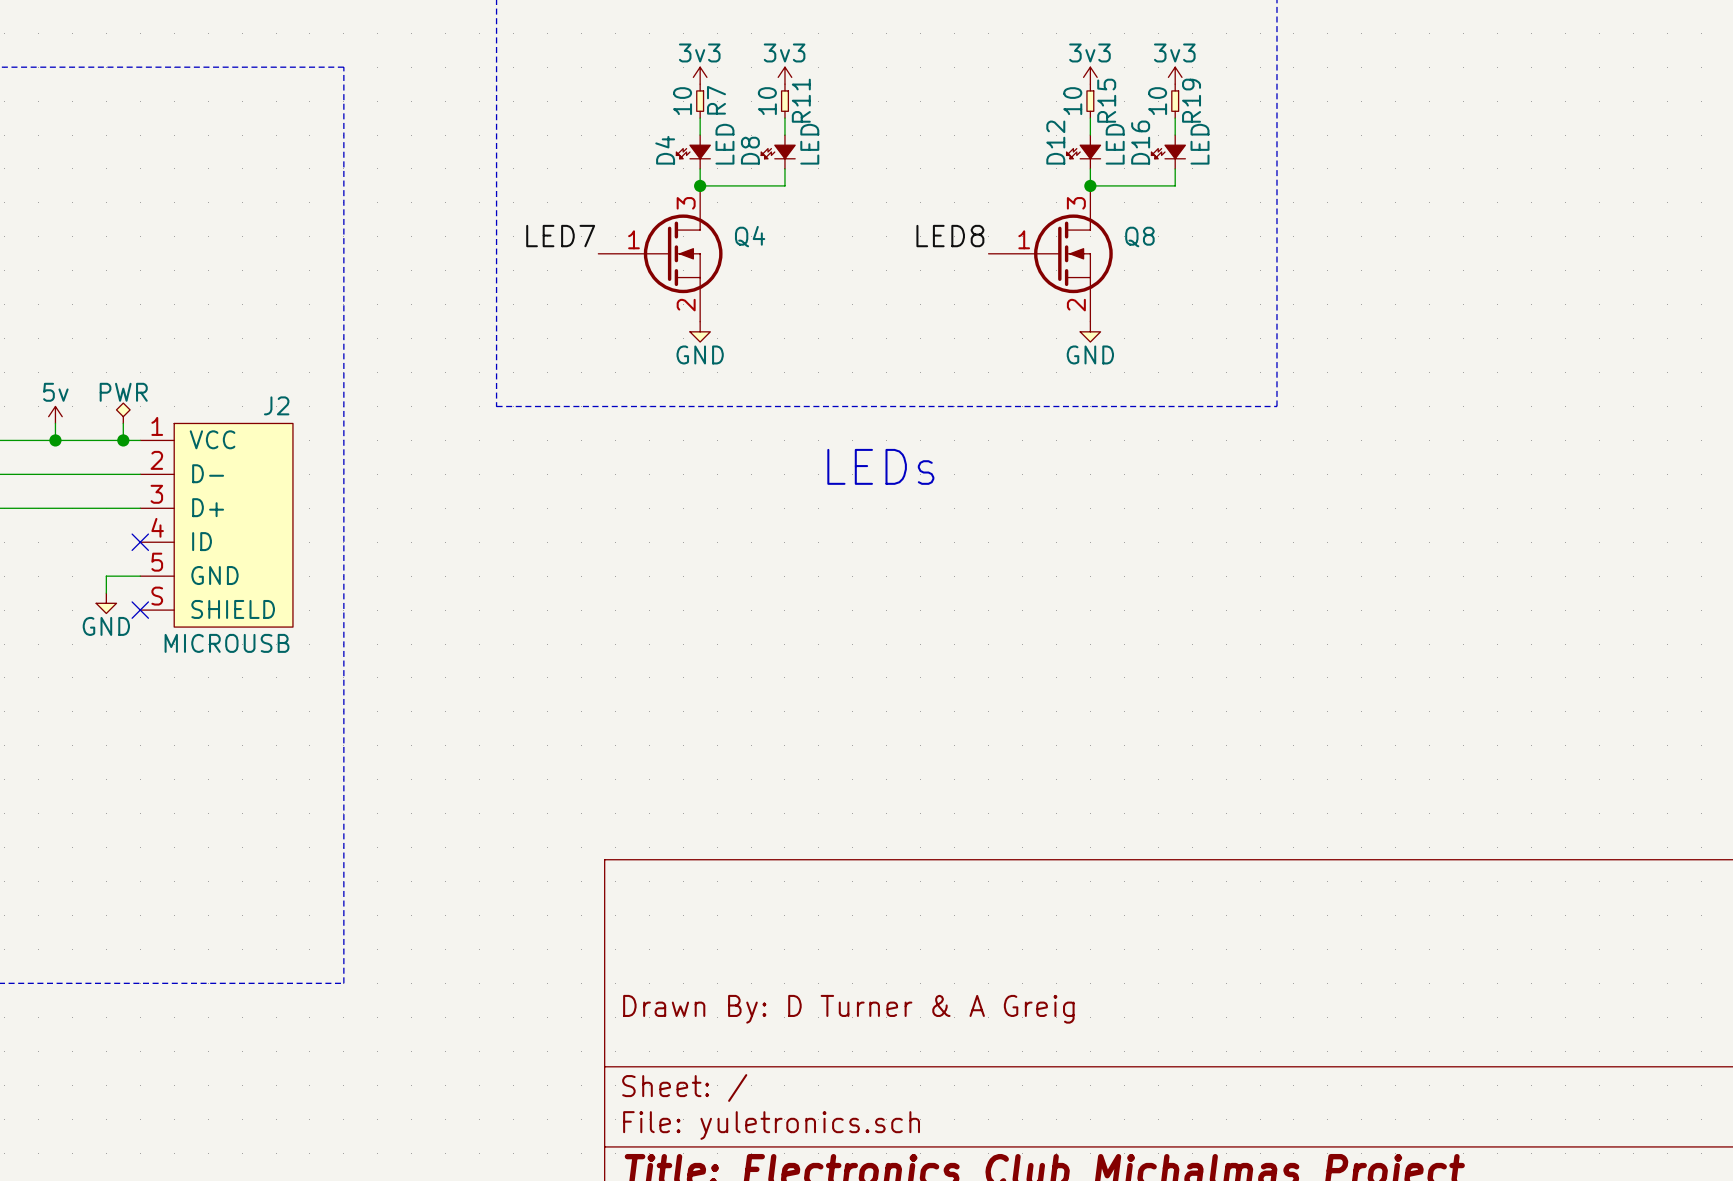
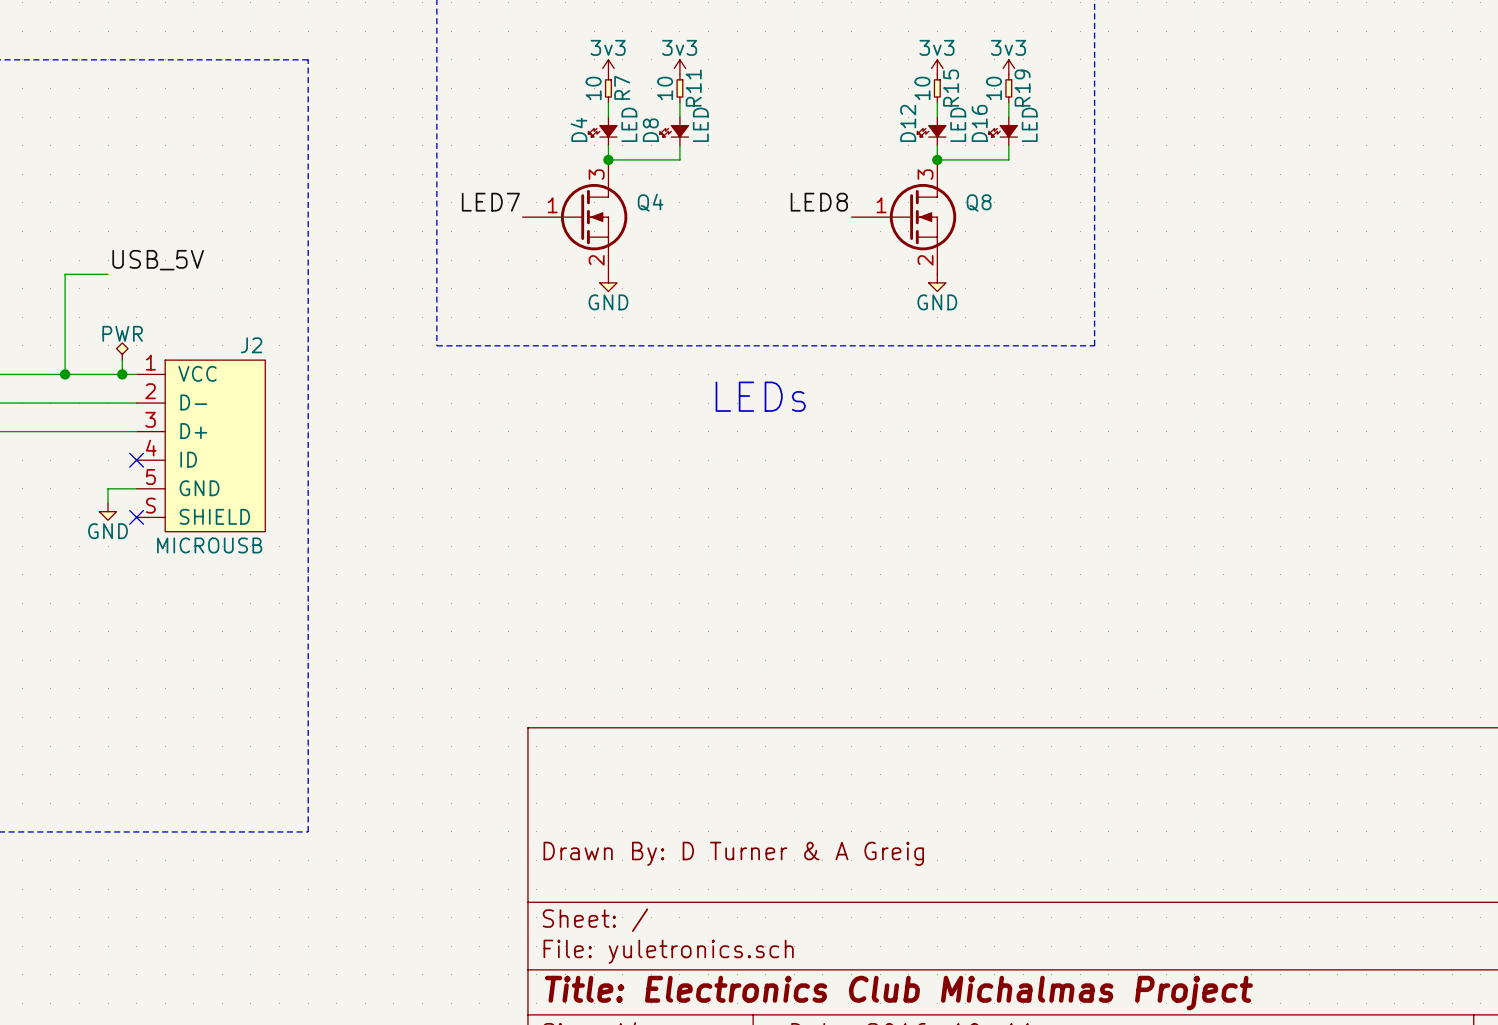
label: none -> USB_5V (158, 260)
wire: none -> (108, 274) (65, 274) (65, 360)
power symbol: 5v (55, 414) -> none

